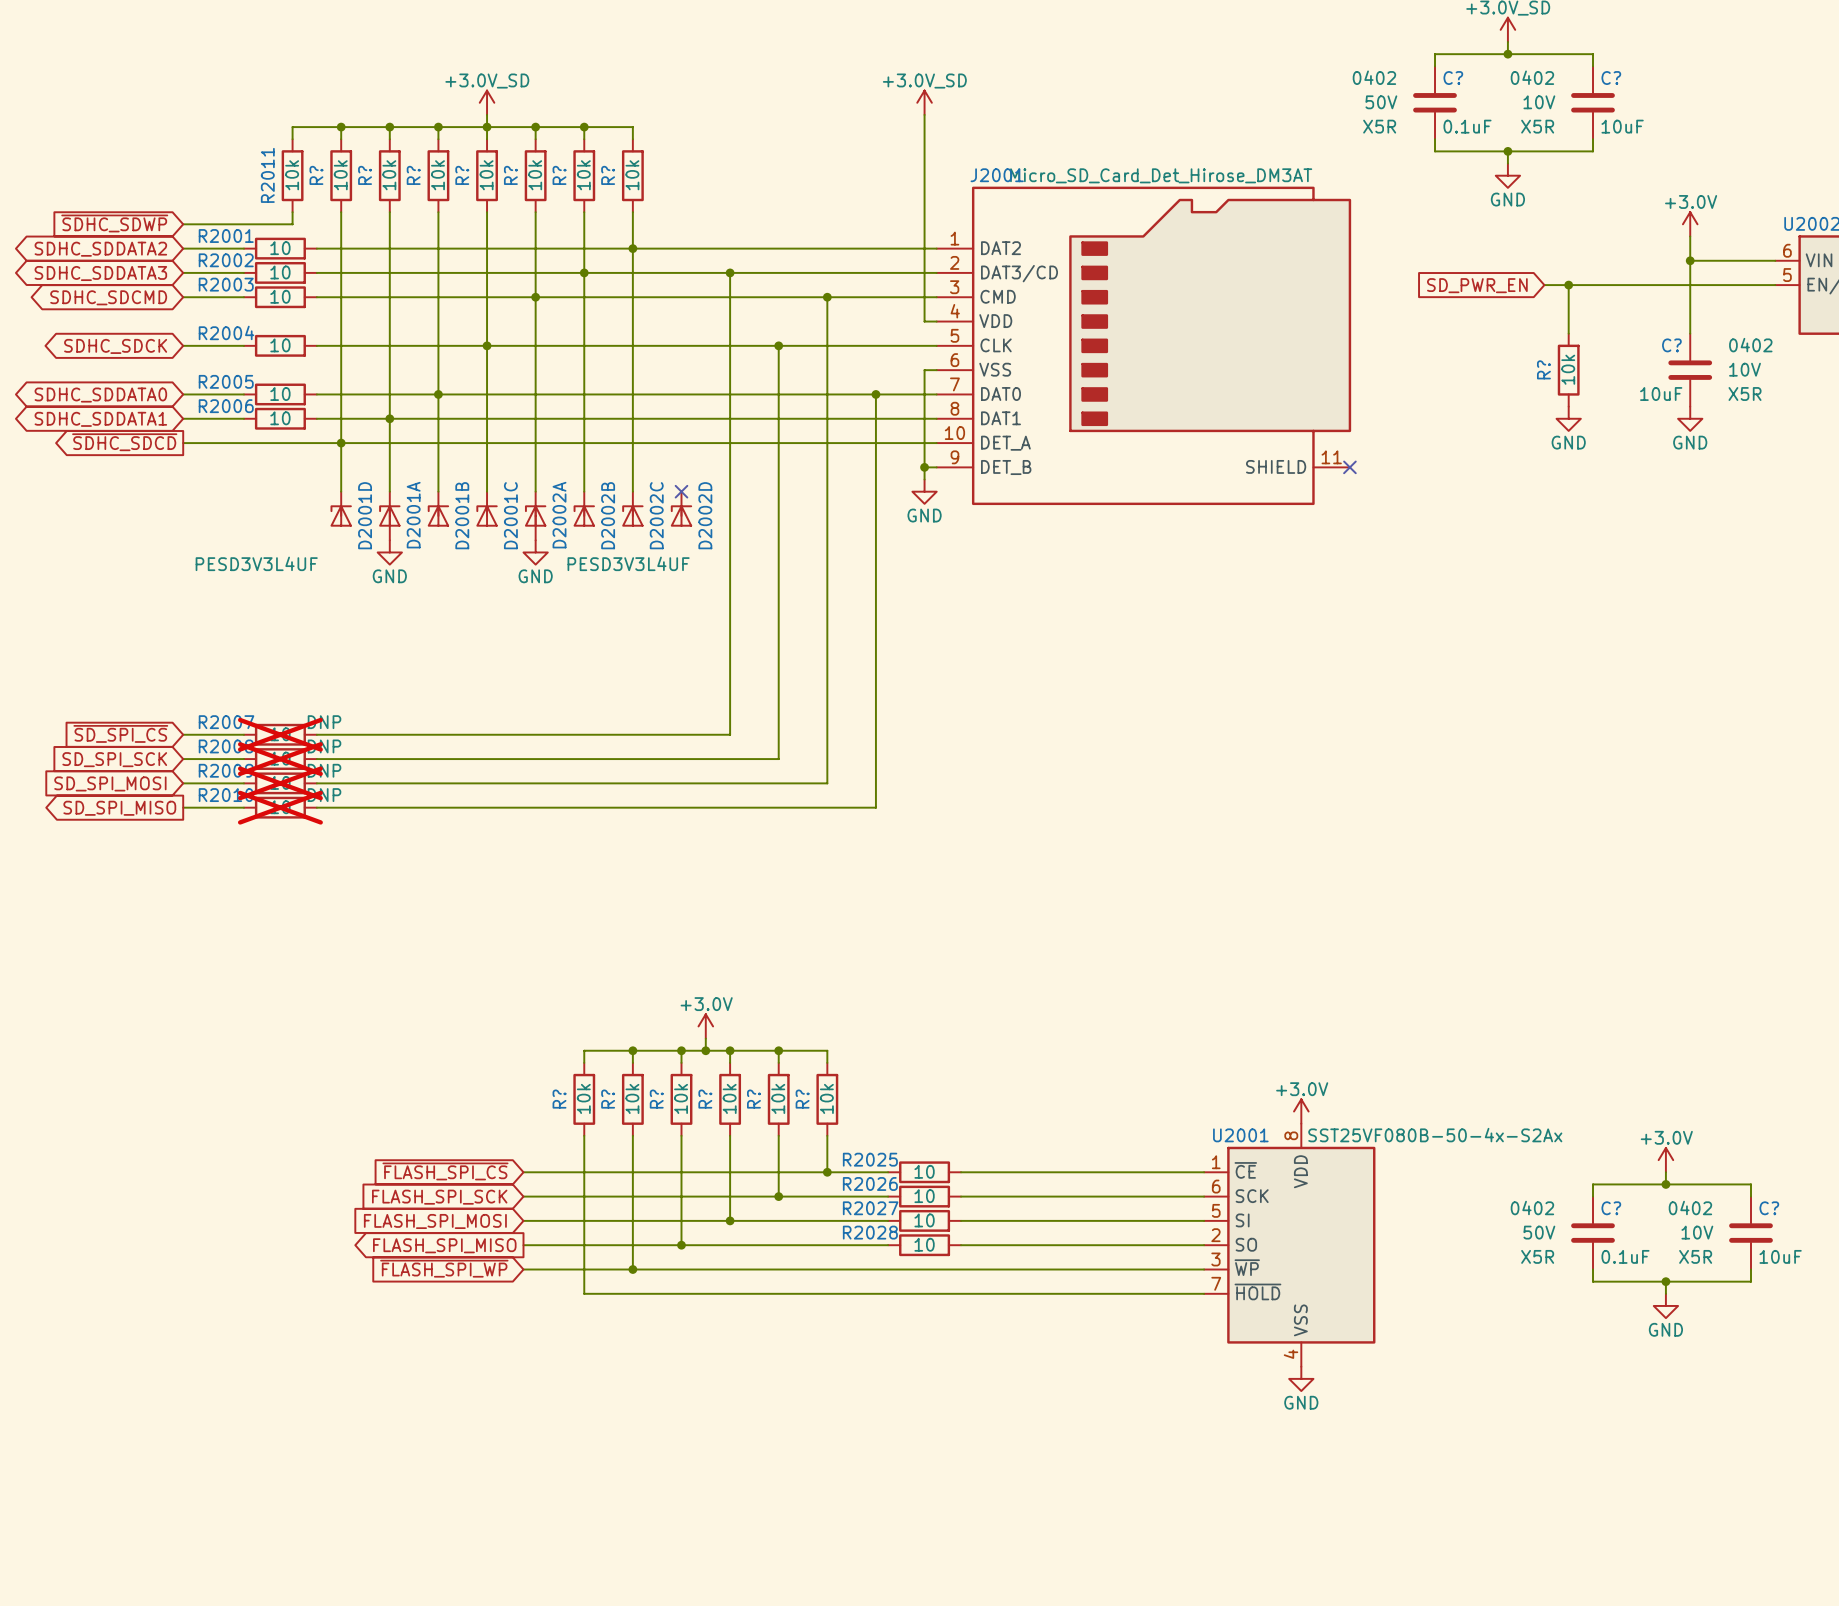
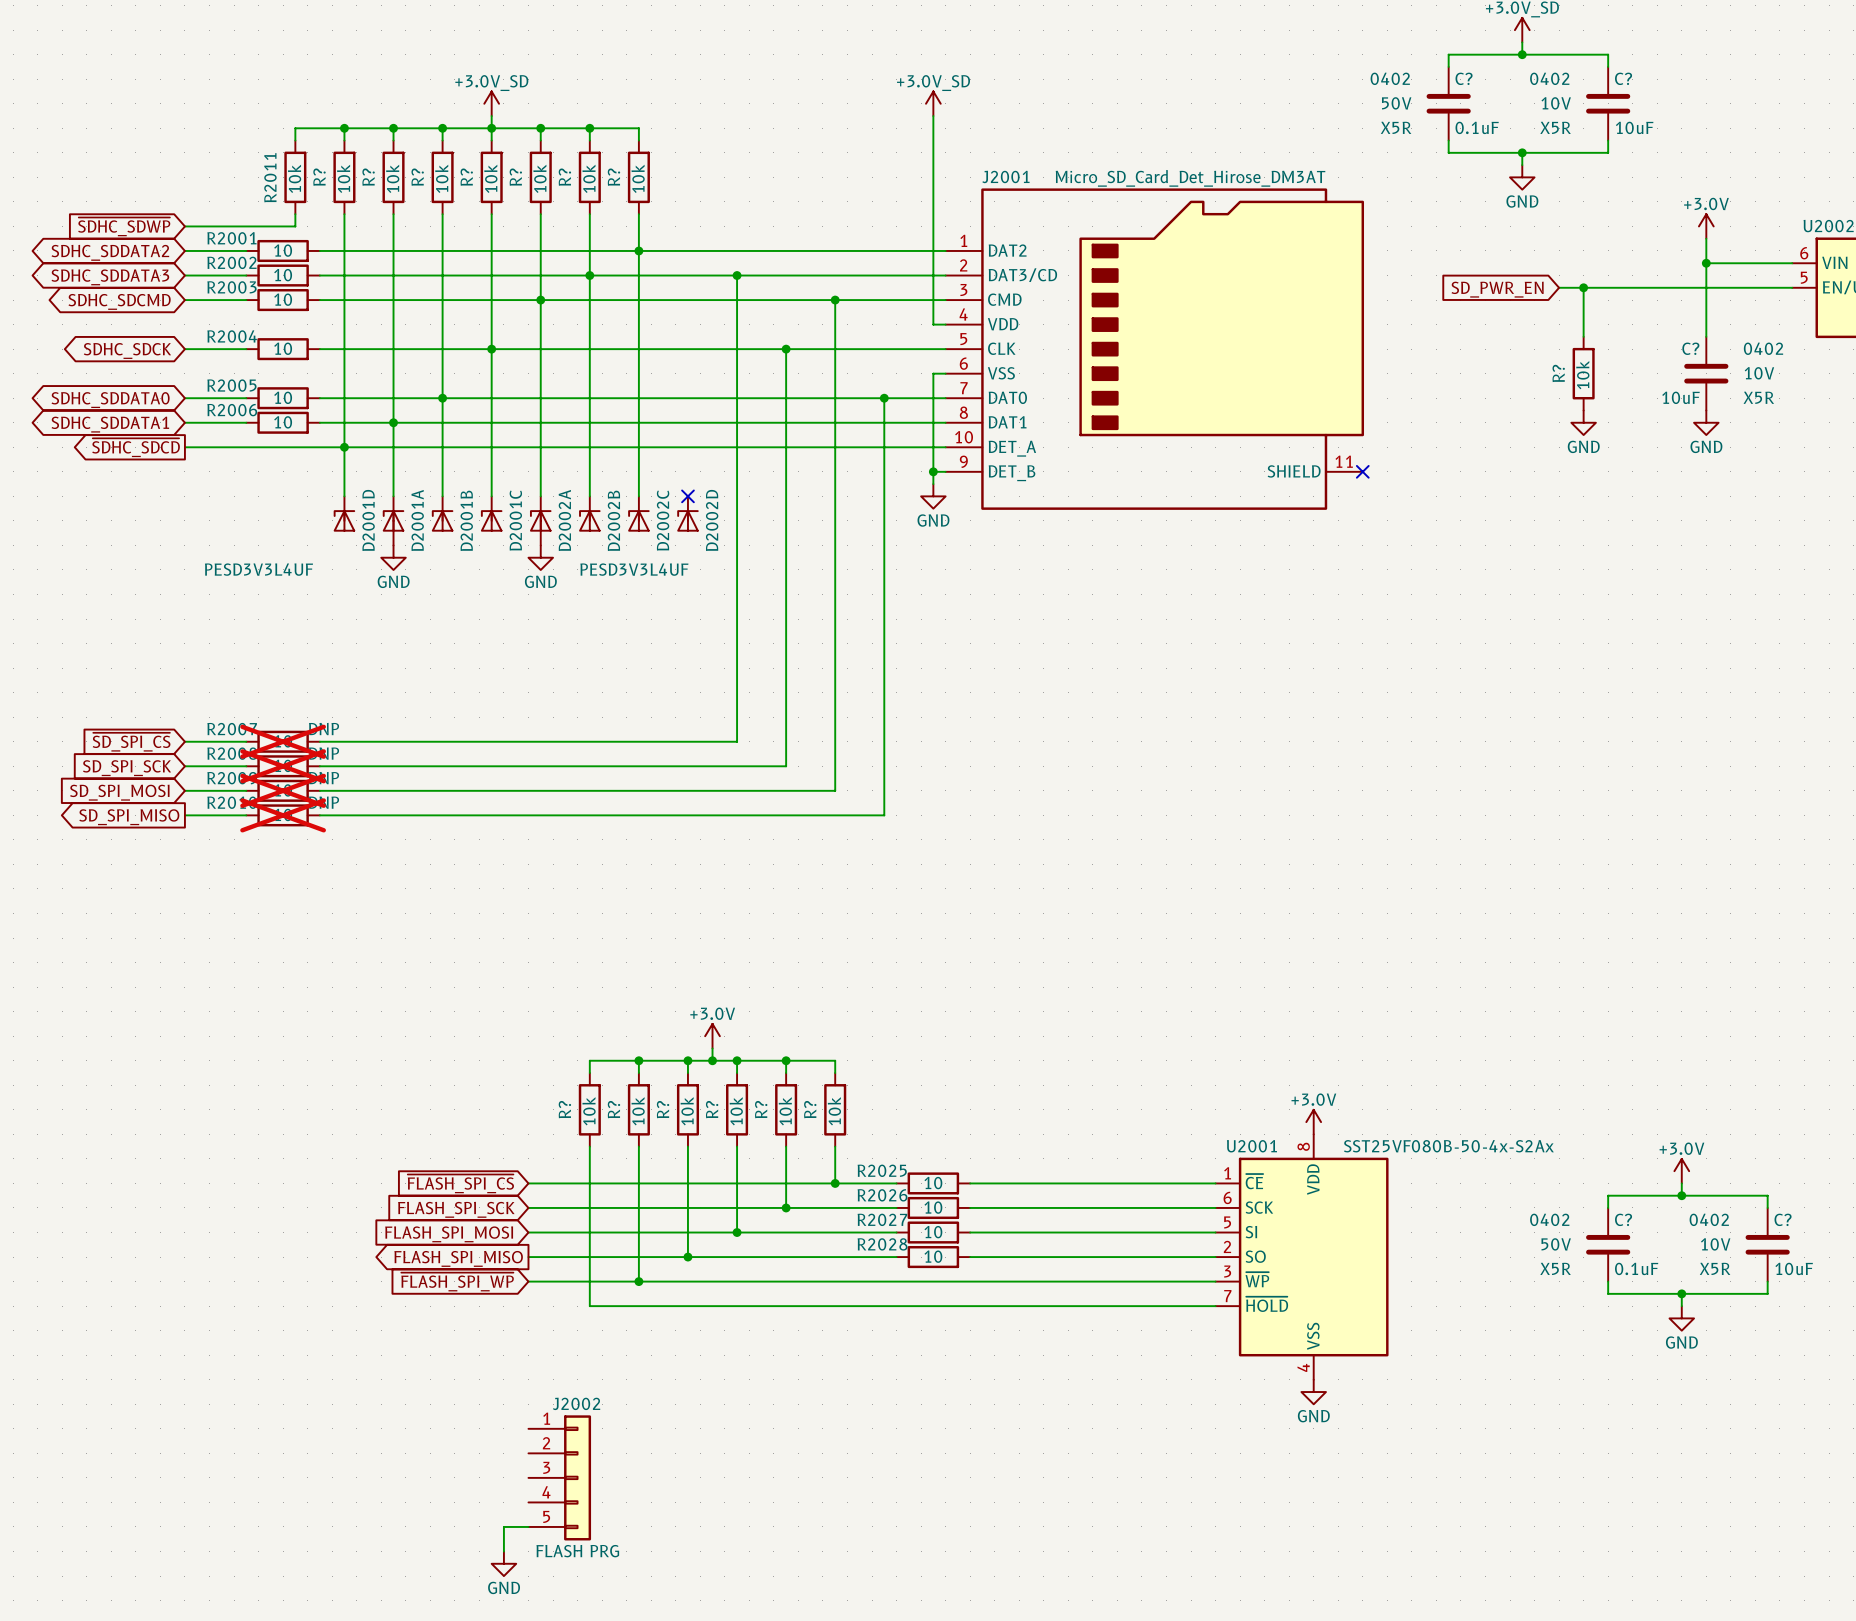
J2002: none -> FLASH PRG (559, 1477)
wire: none -> (528, 1526) (503, 1526) (503, 1551)
power symbol: none -> GND (503, 1563)

